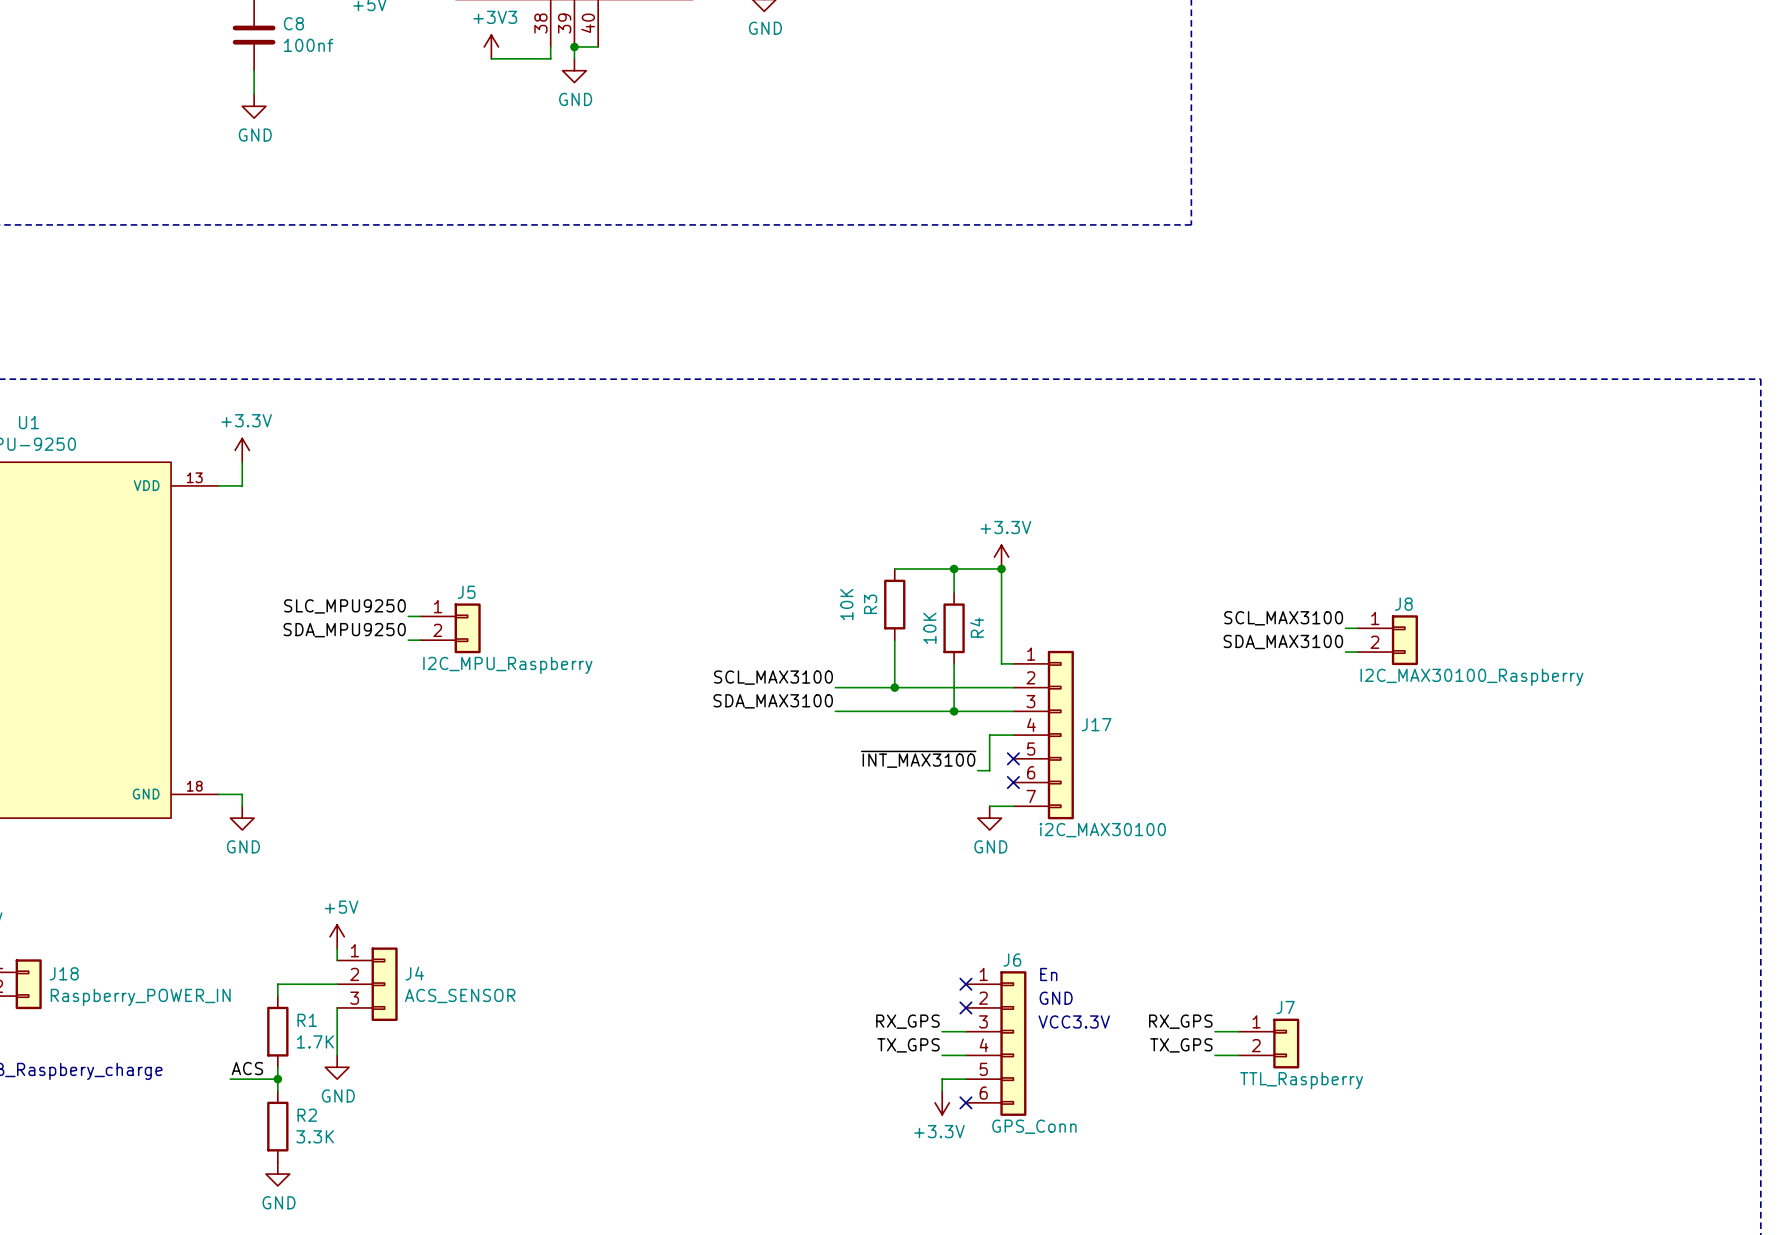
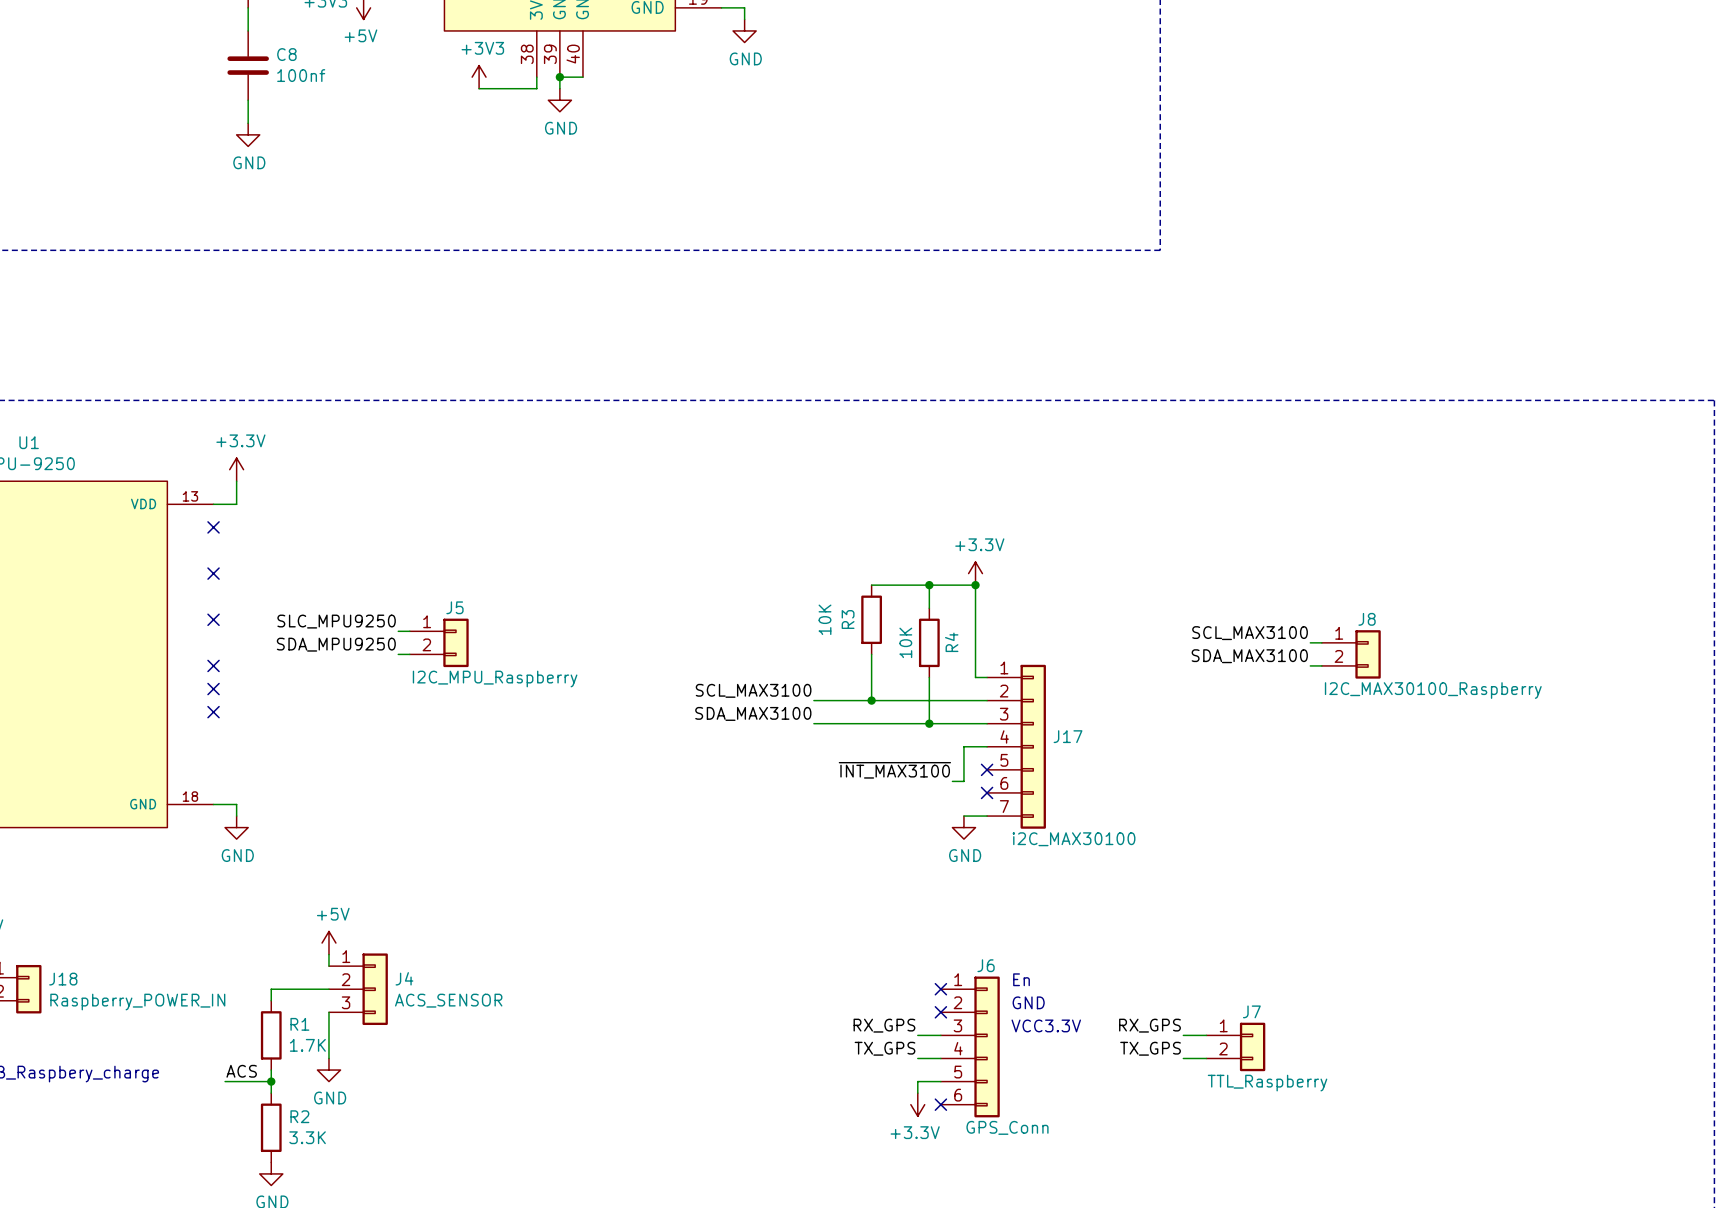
no-connect mark: none -> (213, 527)
no-connect mark: none -> (213, 573)
no-connect mark: none -> (213, 619)
no-connect mark: none -> (213, 665)
no-connect mark: none -> (213, 689)
no-connect mark: none -> (213, 712)

